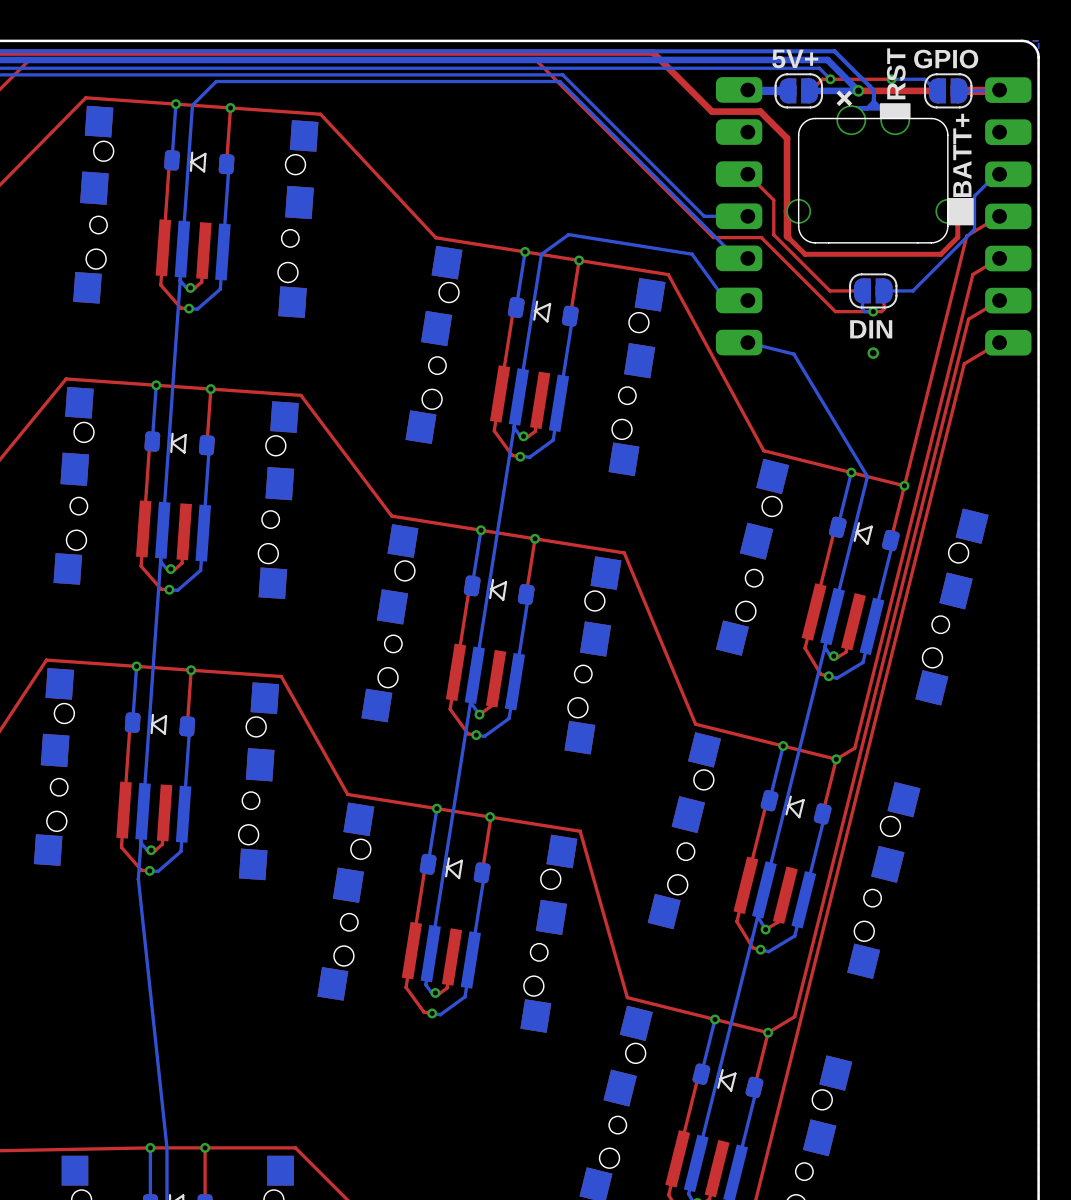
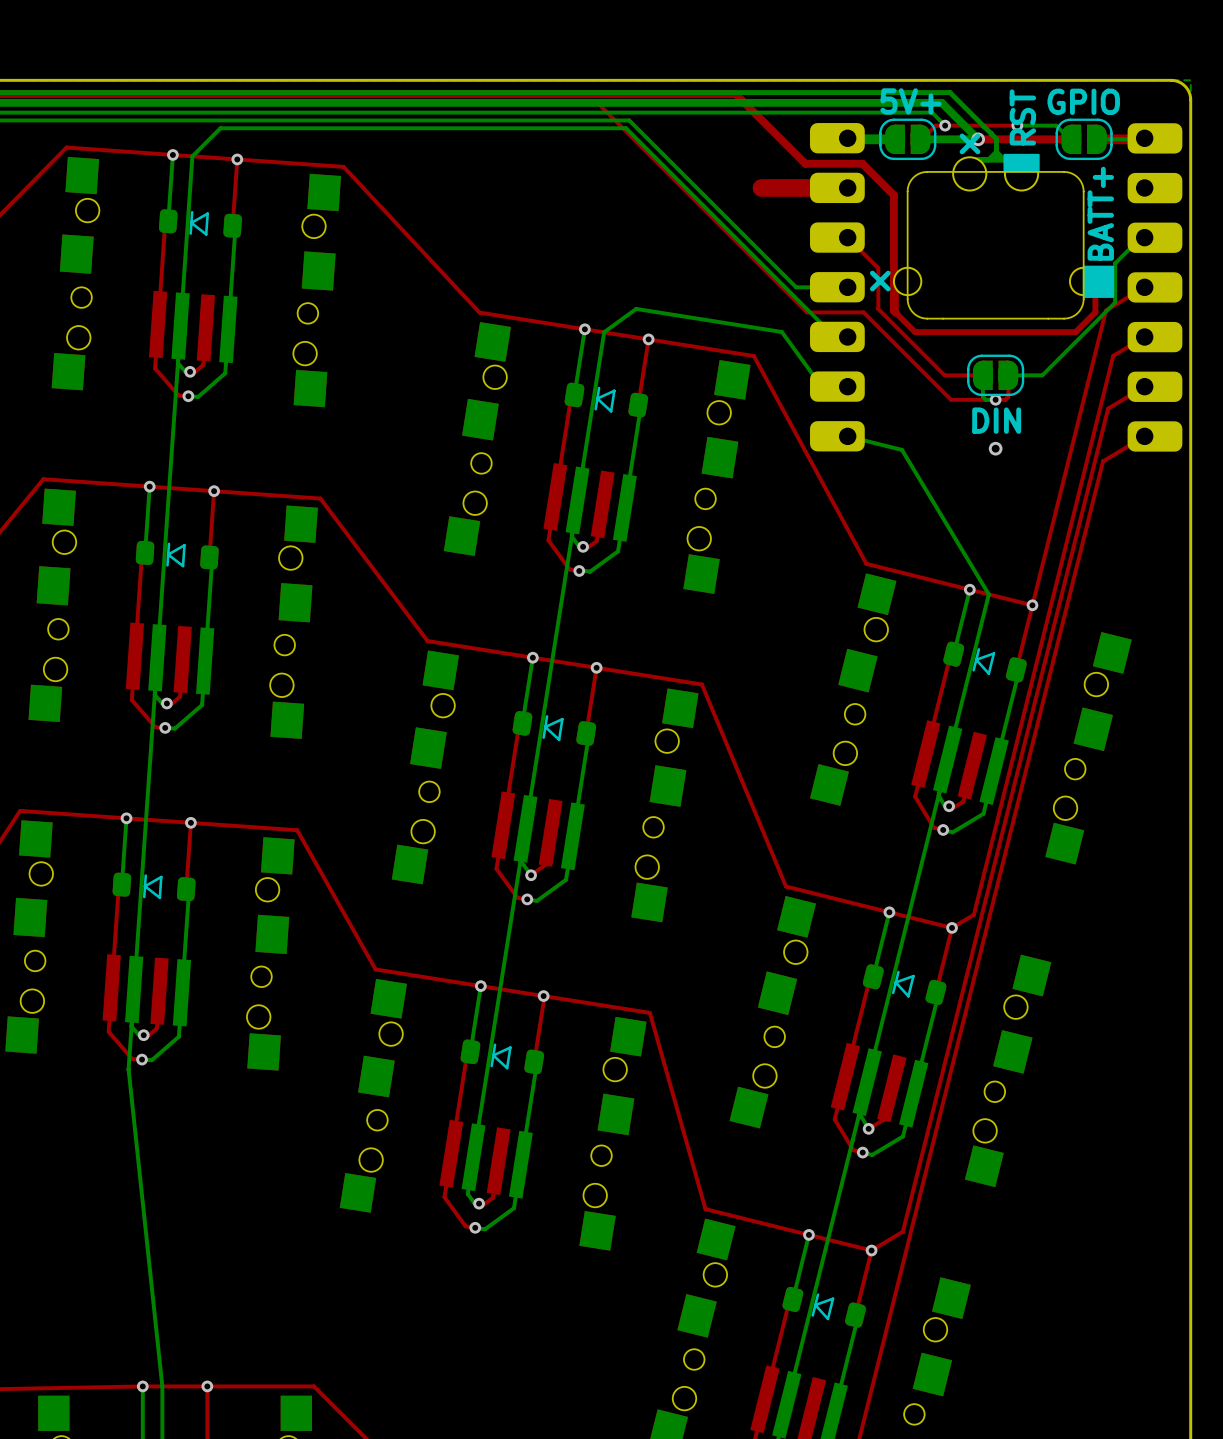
top track: none -> (847, 187) (761, 187)
text: none -> + (880, 281)

